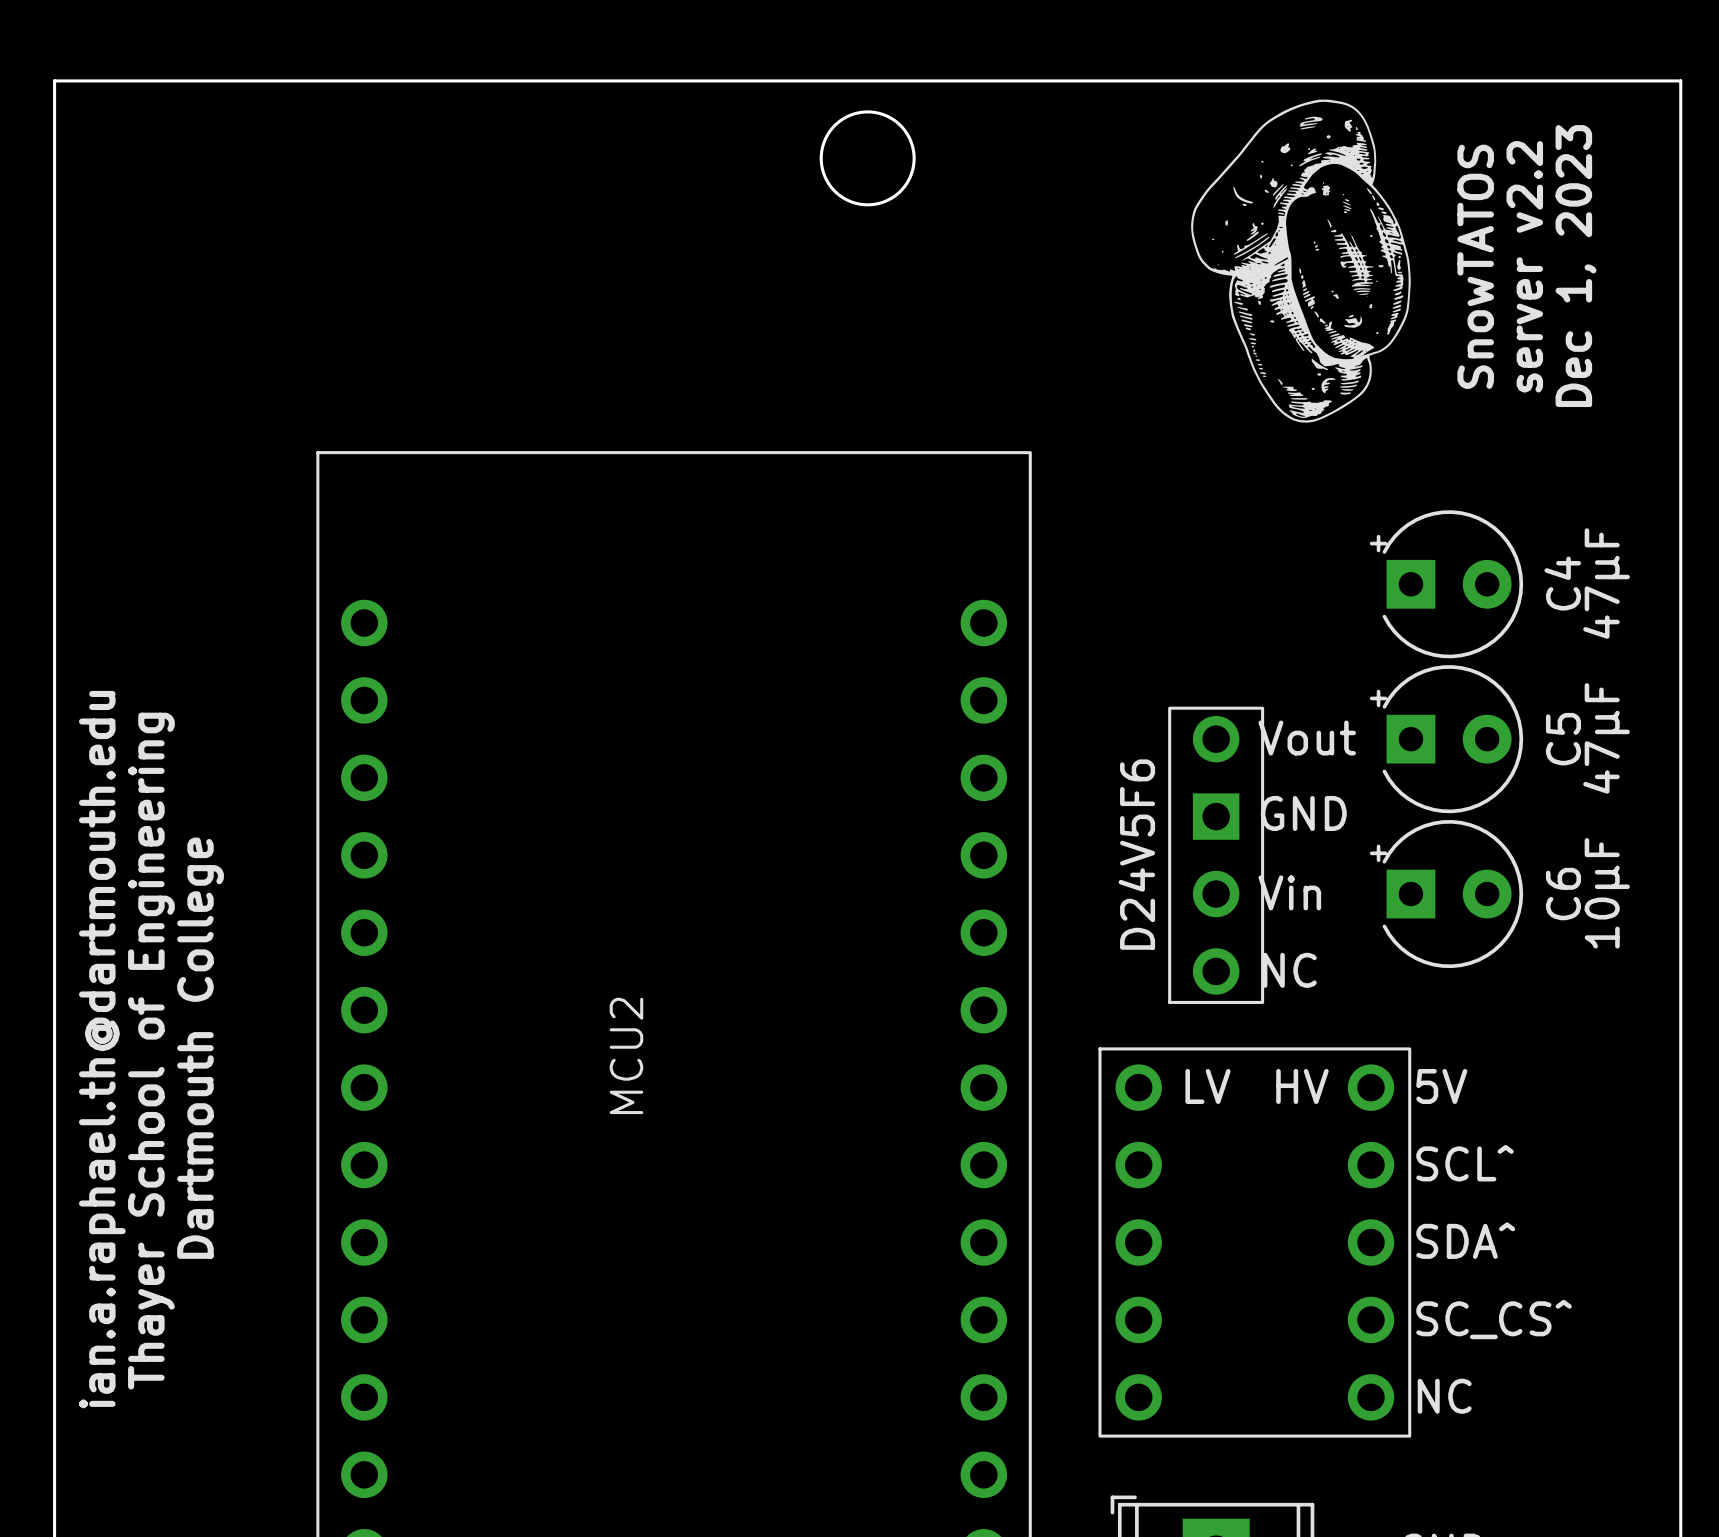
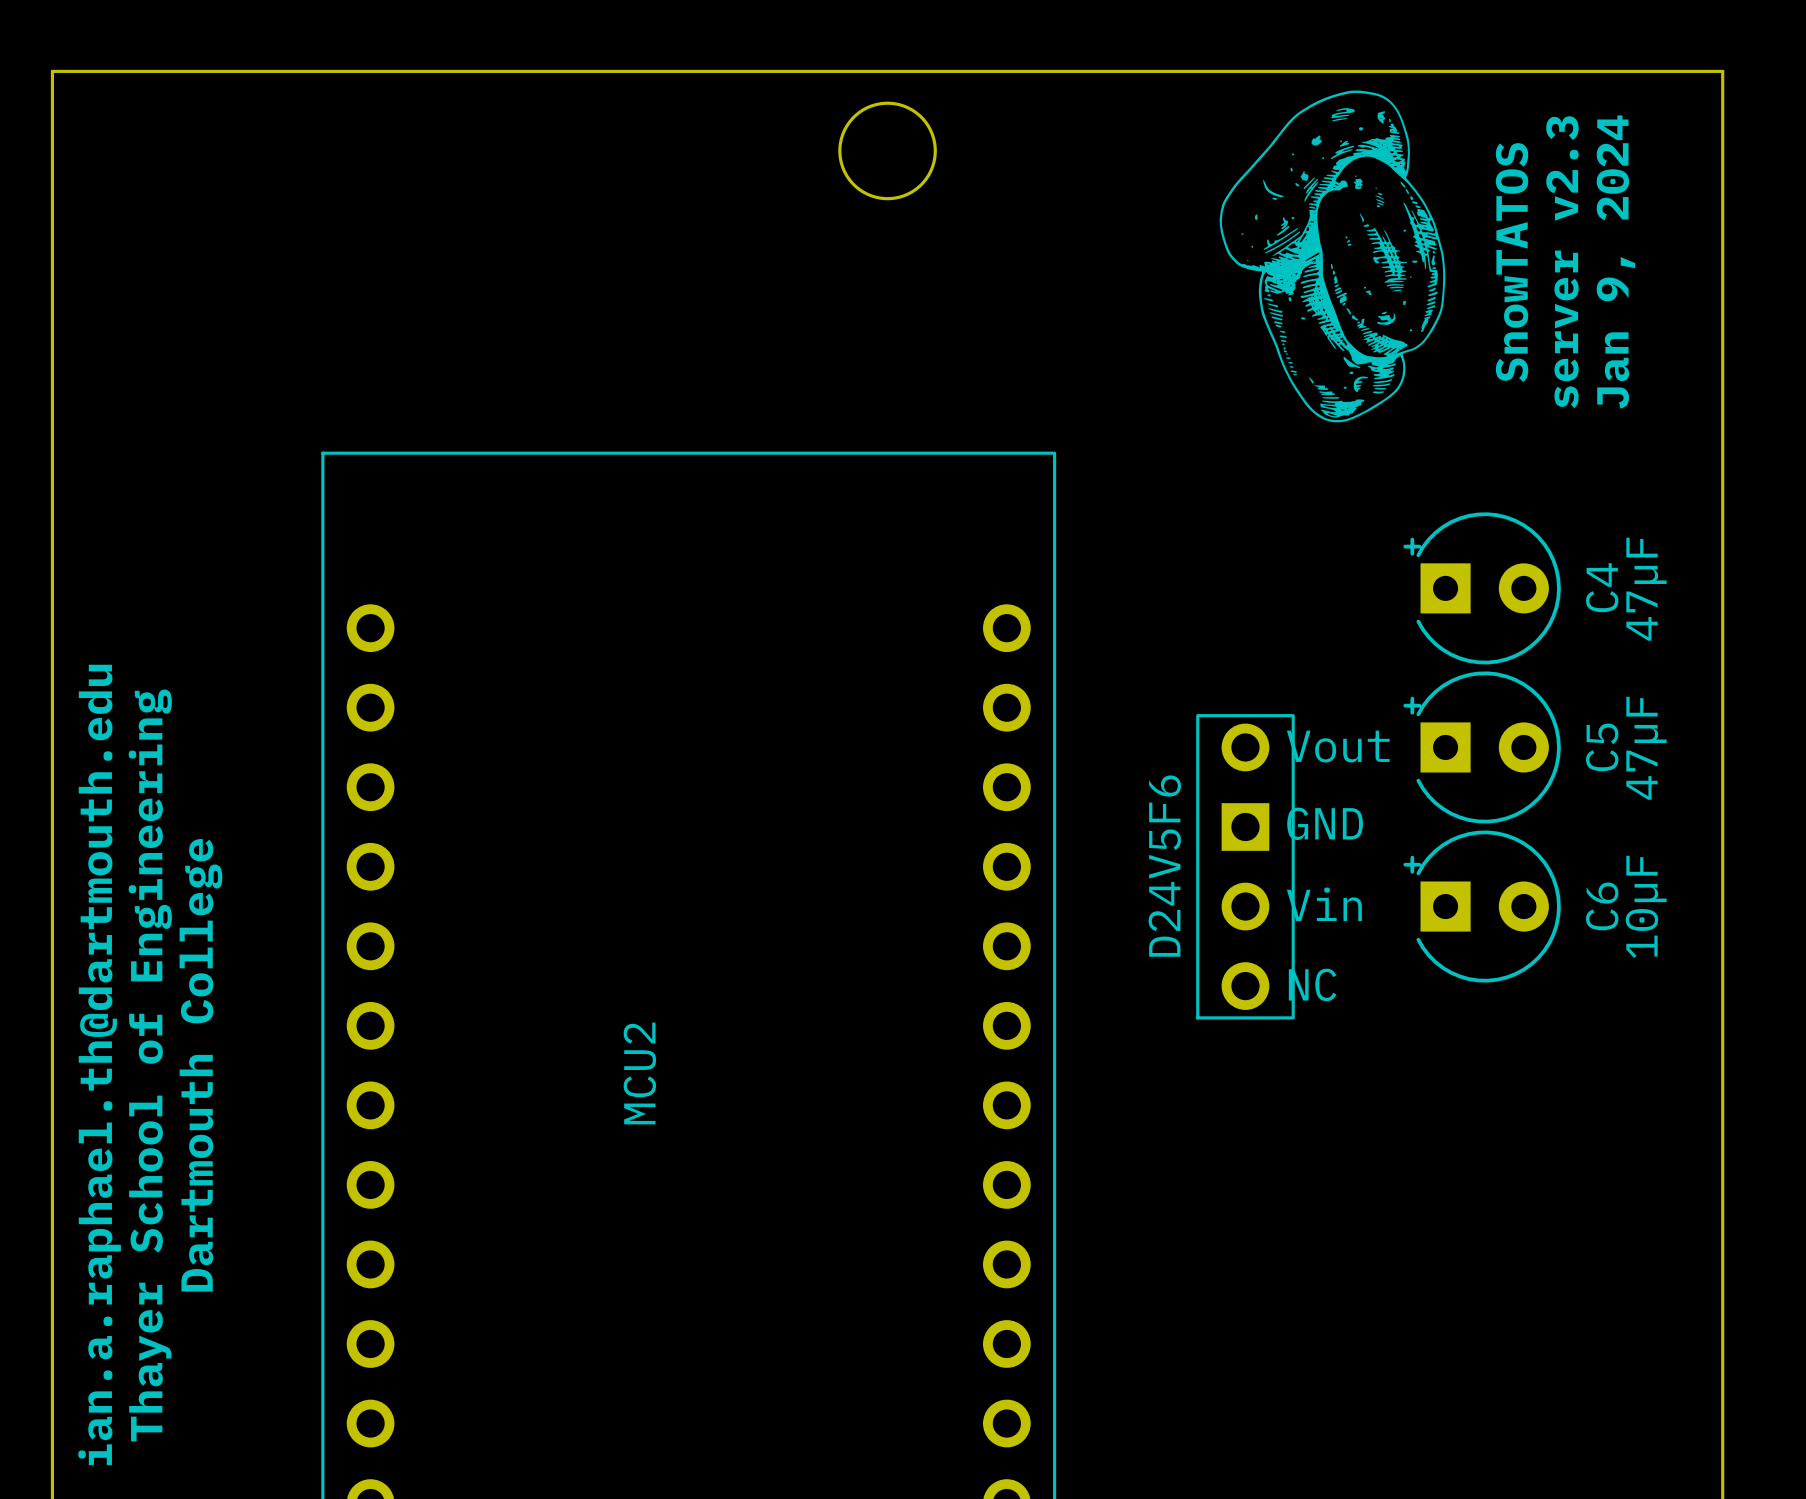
text: server v2.2 (1524, 266) -> server v2.3 (1562, 262)
text: Dec 1, 2023 (1576, 266) -> Jan 9, 2024 (1615, 262)
text: LV (1208, 1086) -> none
text: HV (1302, 1086) -> none
text: 5V (1441, 1086) -> none
text: SCL^ (1465, 1163) -> none
text: SDA^ (1465, 1240) -> none
part: (1254, 1242) -> none
text: SC_CS^ (1494, 1319) -> none
text: NC (1444, 1396) -> none

